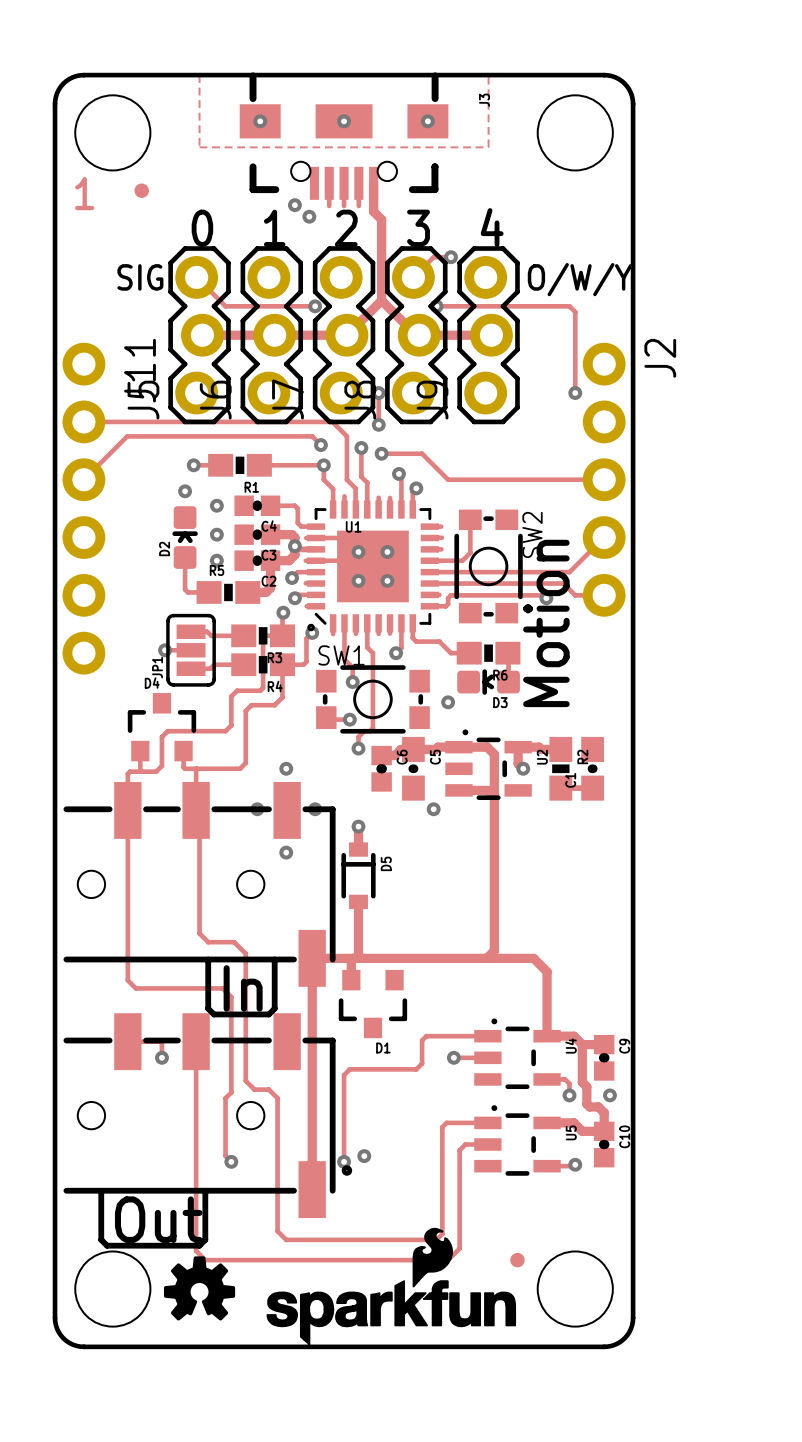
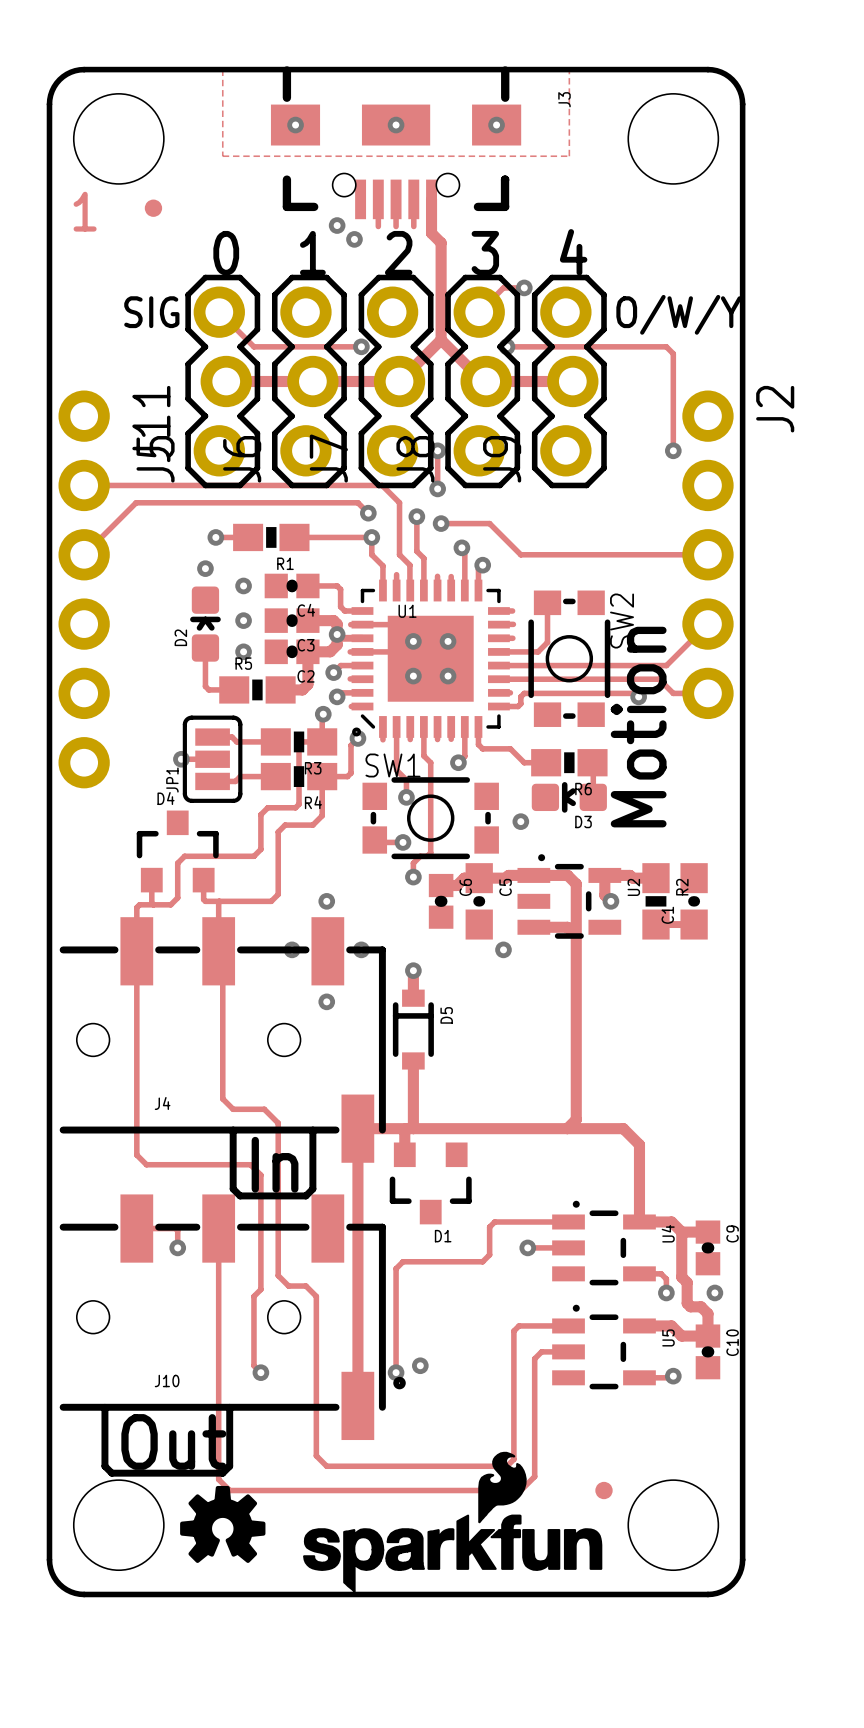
J4 name: none -> J4 (162, 1103)
J10 name: none -> J10 (167, 1381)

